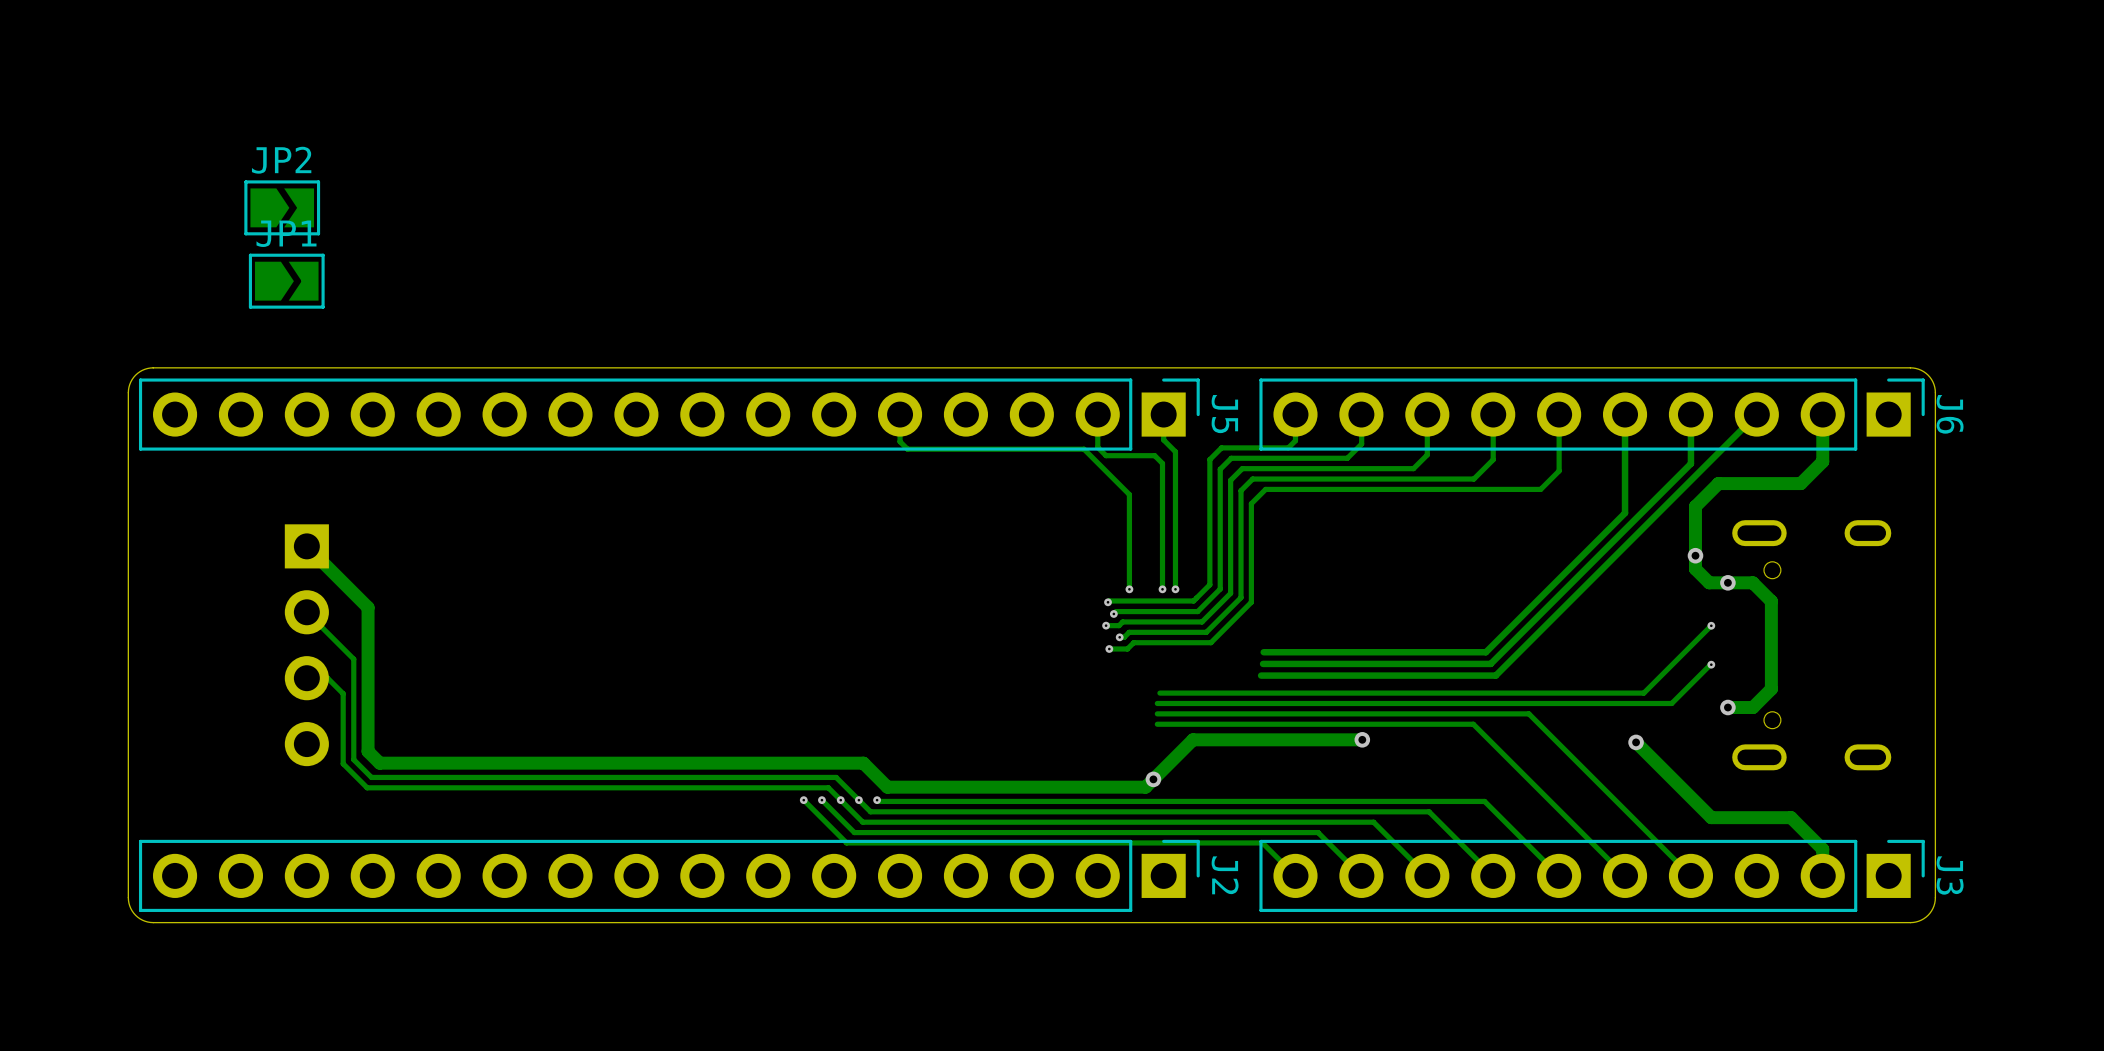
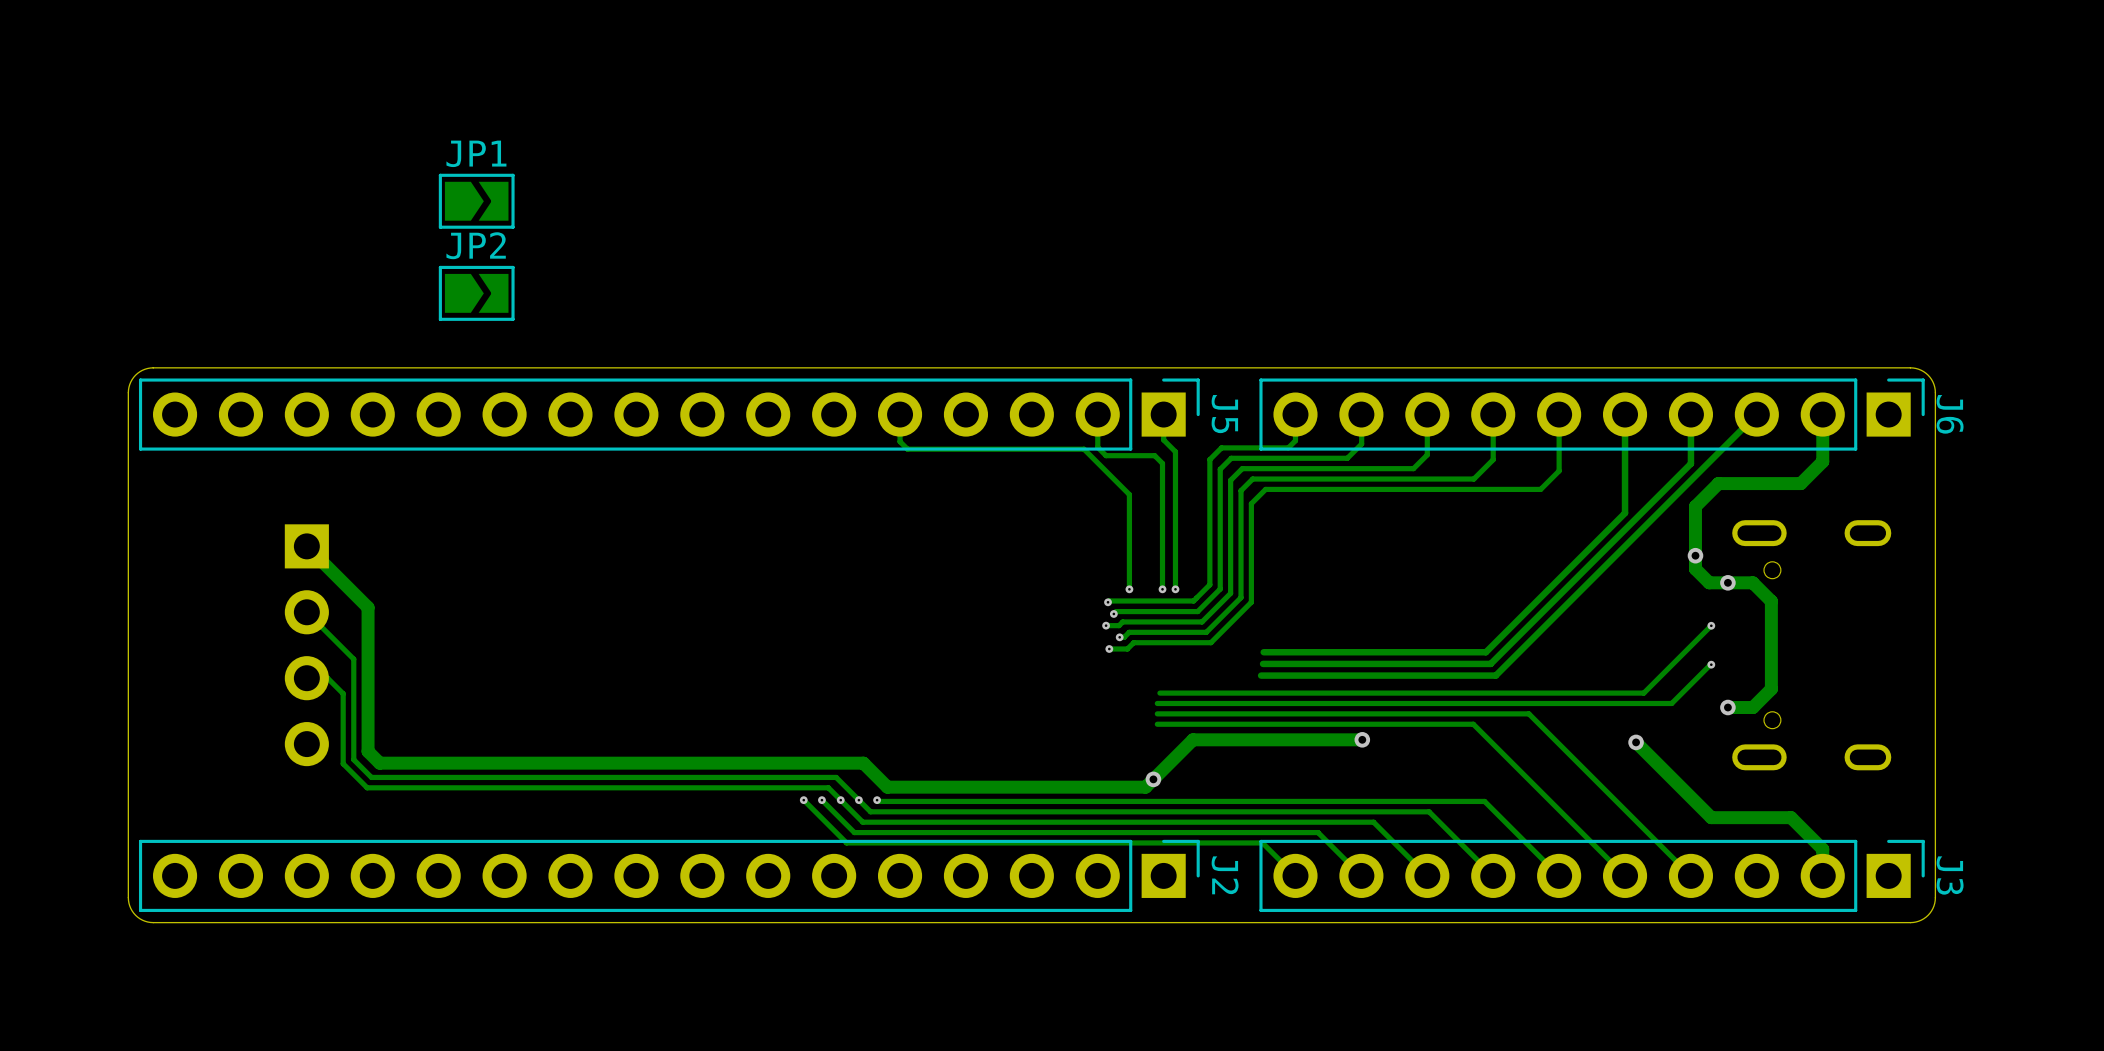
JP2 position: (282, 207) -> (476, 293)
JP1 position: (286, 281) -> (476, 201)

